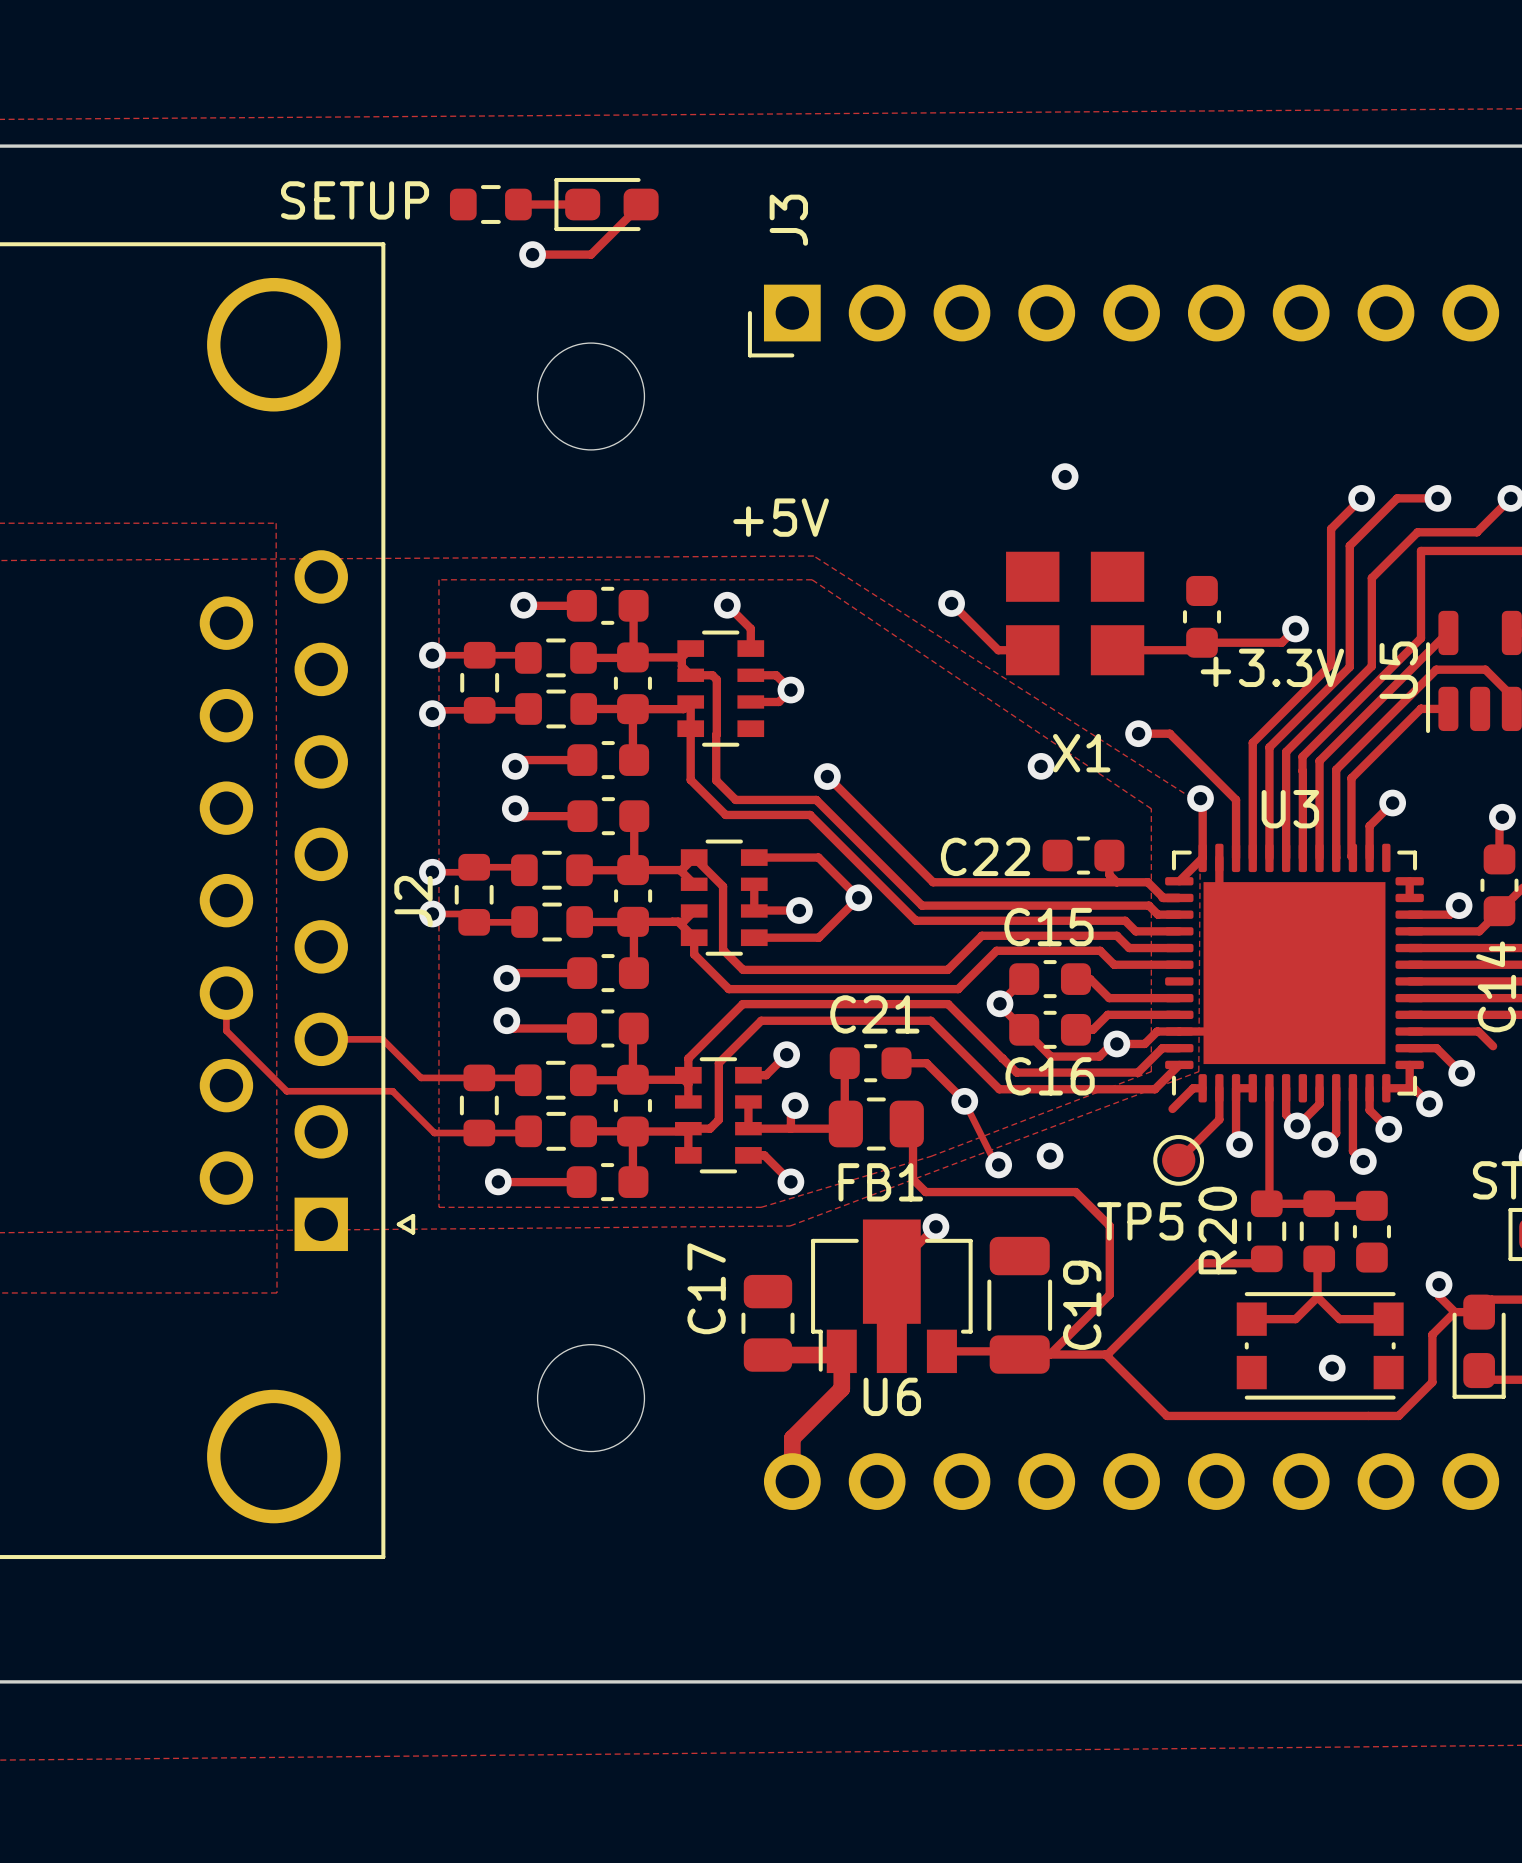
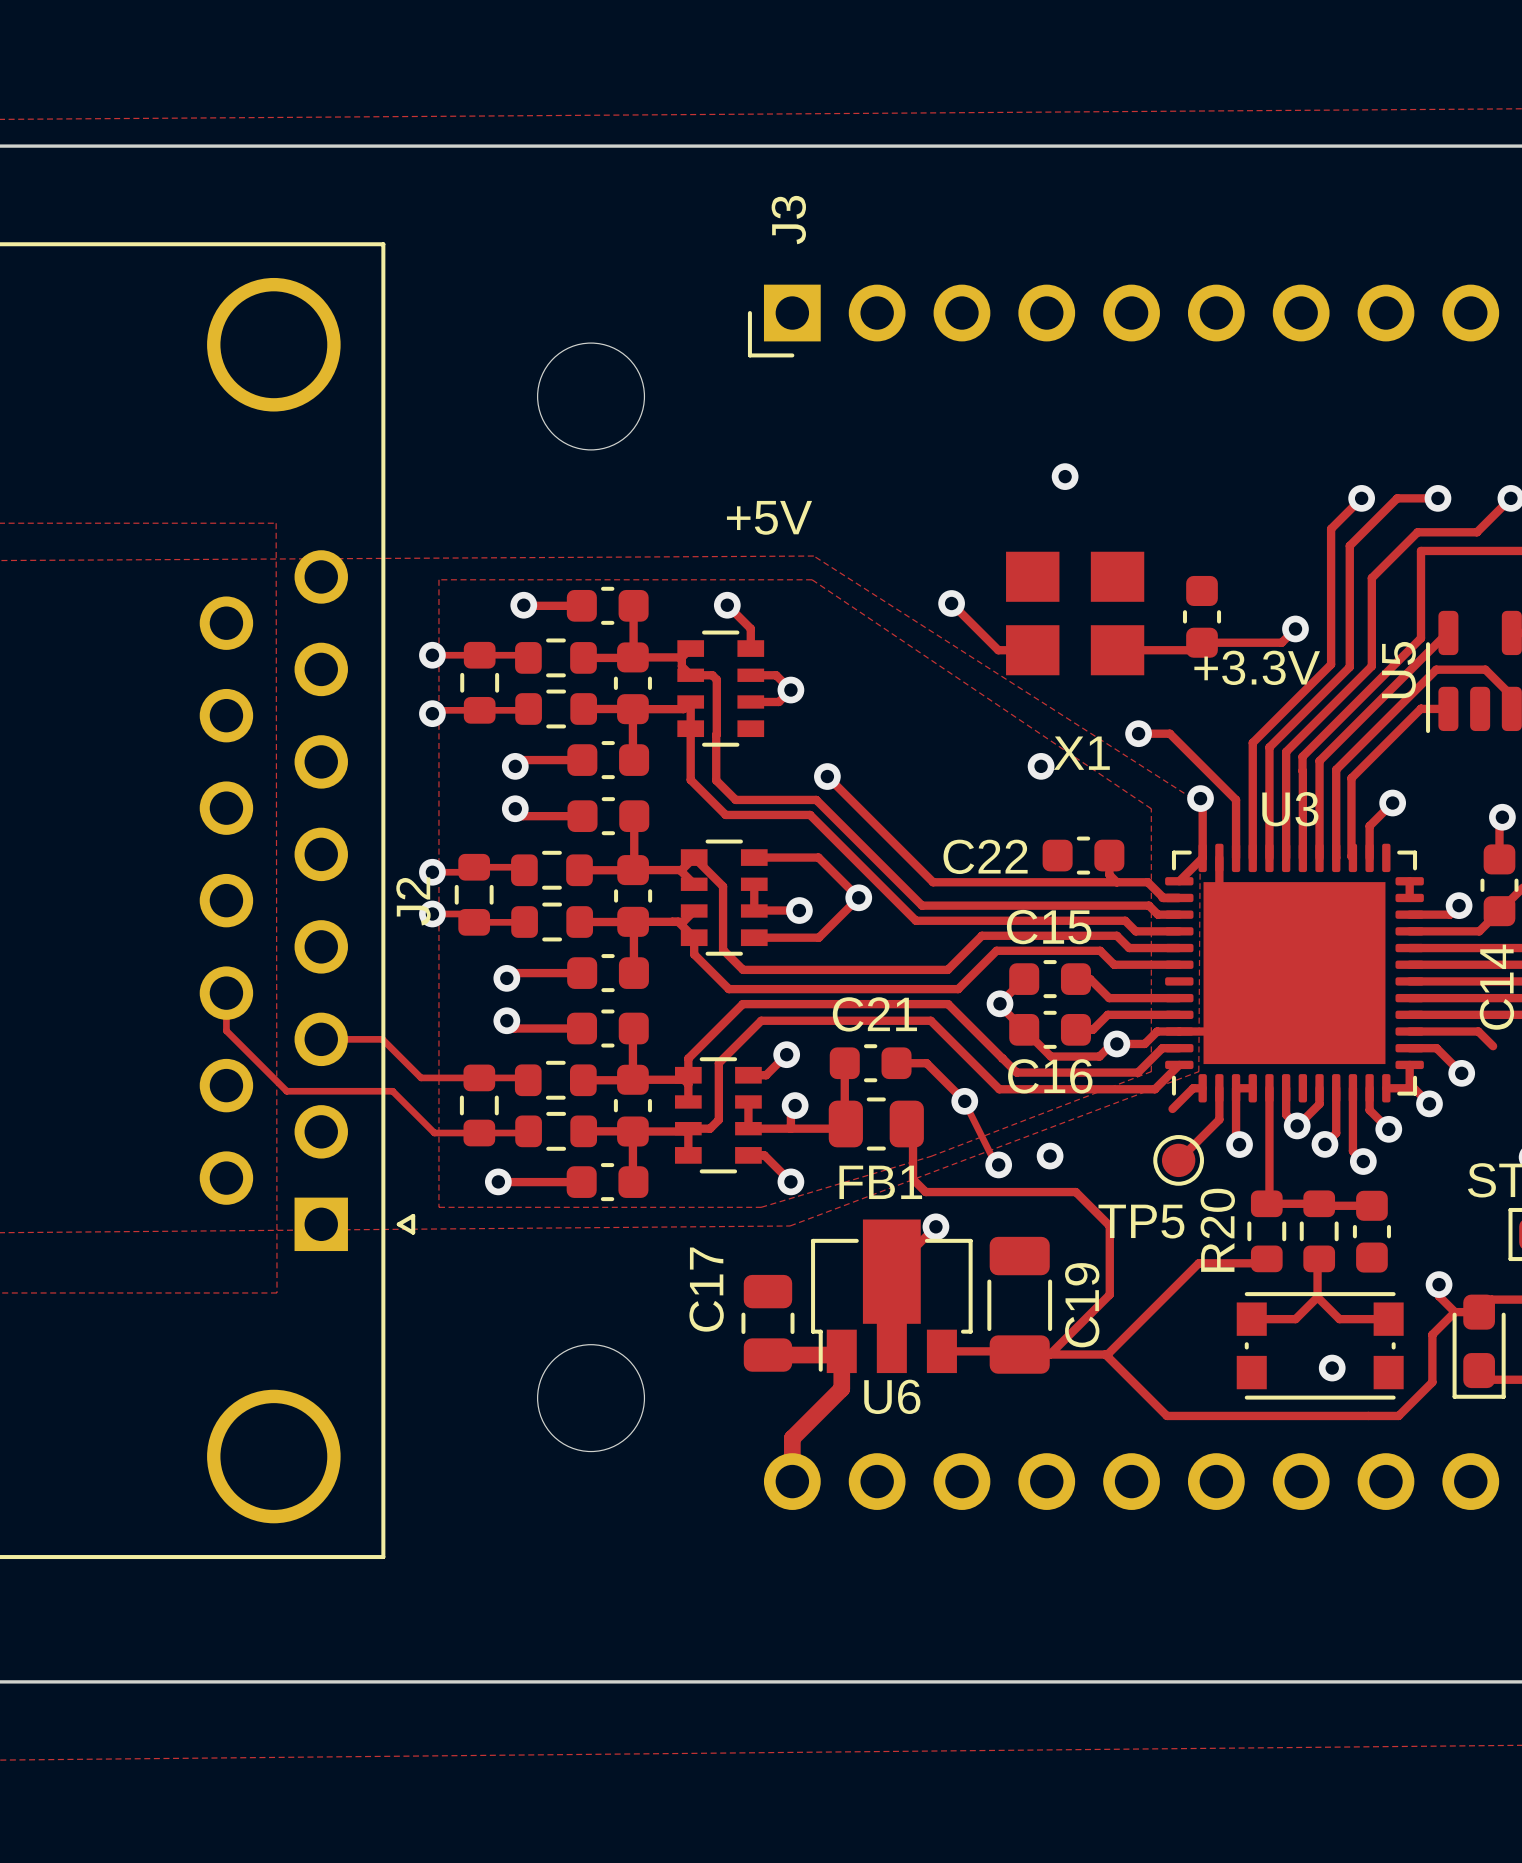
text: SETUP (355, 200) -> none
part: (490, 204) -> none
track: (518, 204) (582, 204) -> none
part: (606, 204) -> none
track: (641, 204) (591, 254) (532, 254) -> none
via: (532, 254) -> none

